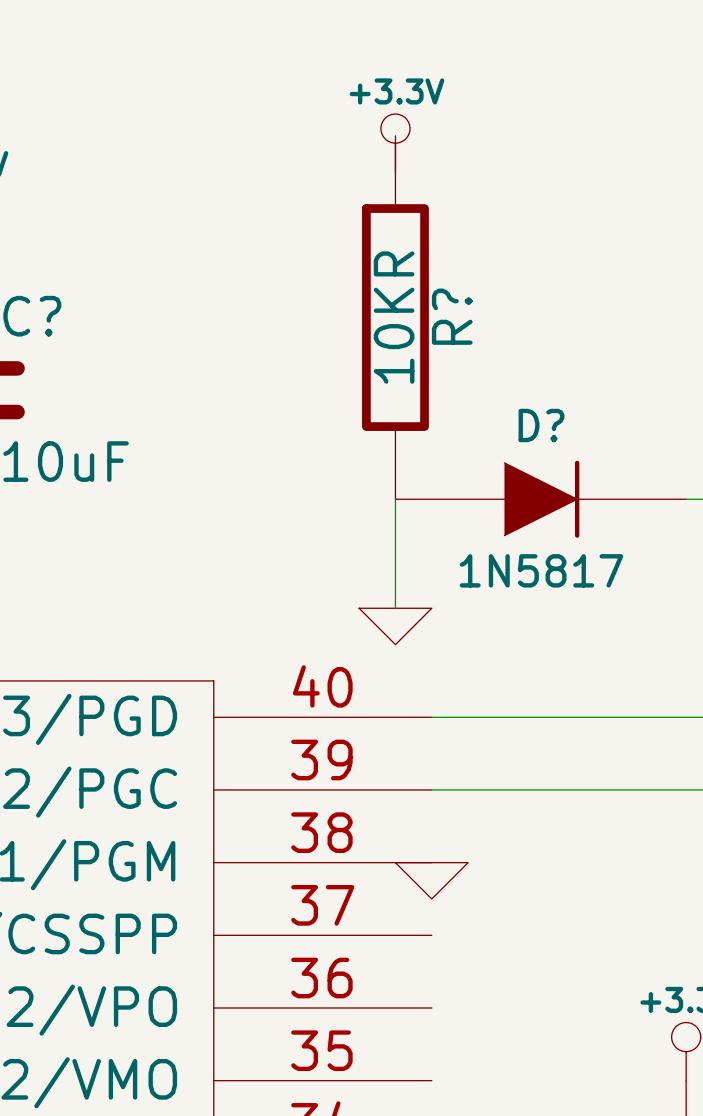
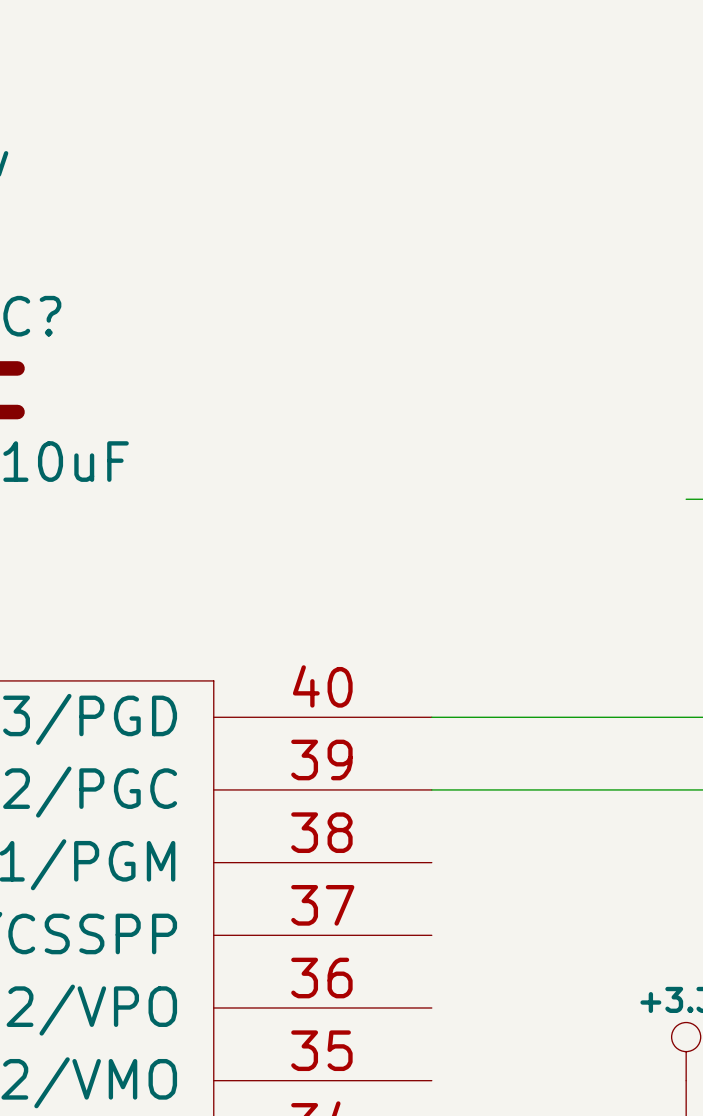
power symbol: +3.3V (395, 143) -> none
R?: 10KR (395, 317) -> none
wire: (395, 499) (395, 608) -> none
D?: 1N5817 (540, 499) -> none
power symbol: (395, 626) -> none
power symbol: (431, 880) -> none

